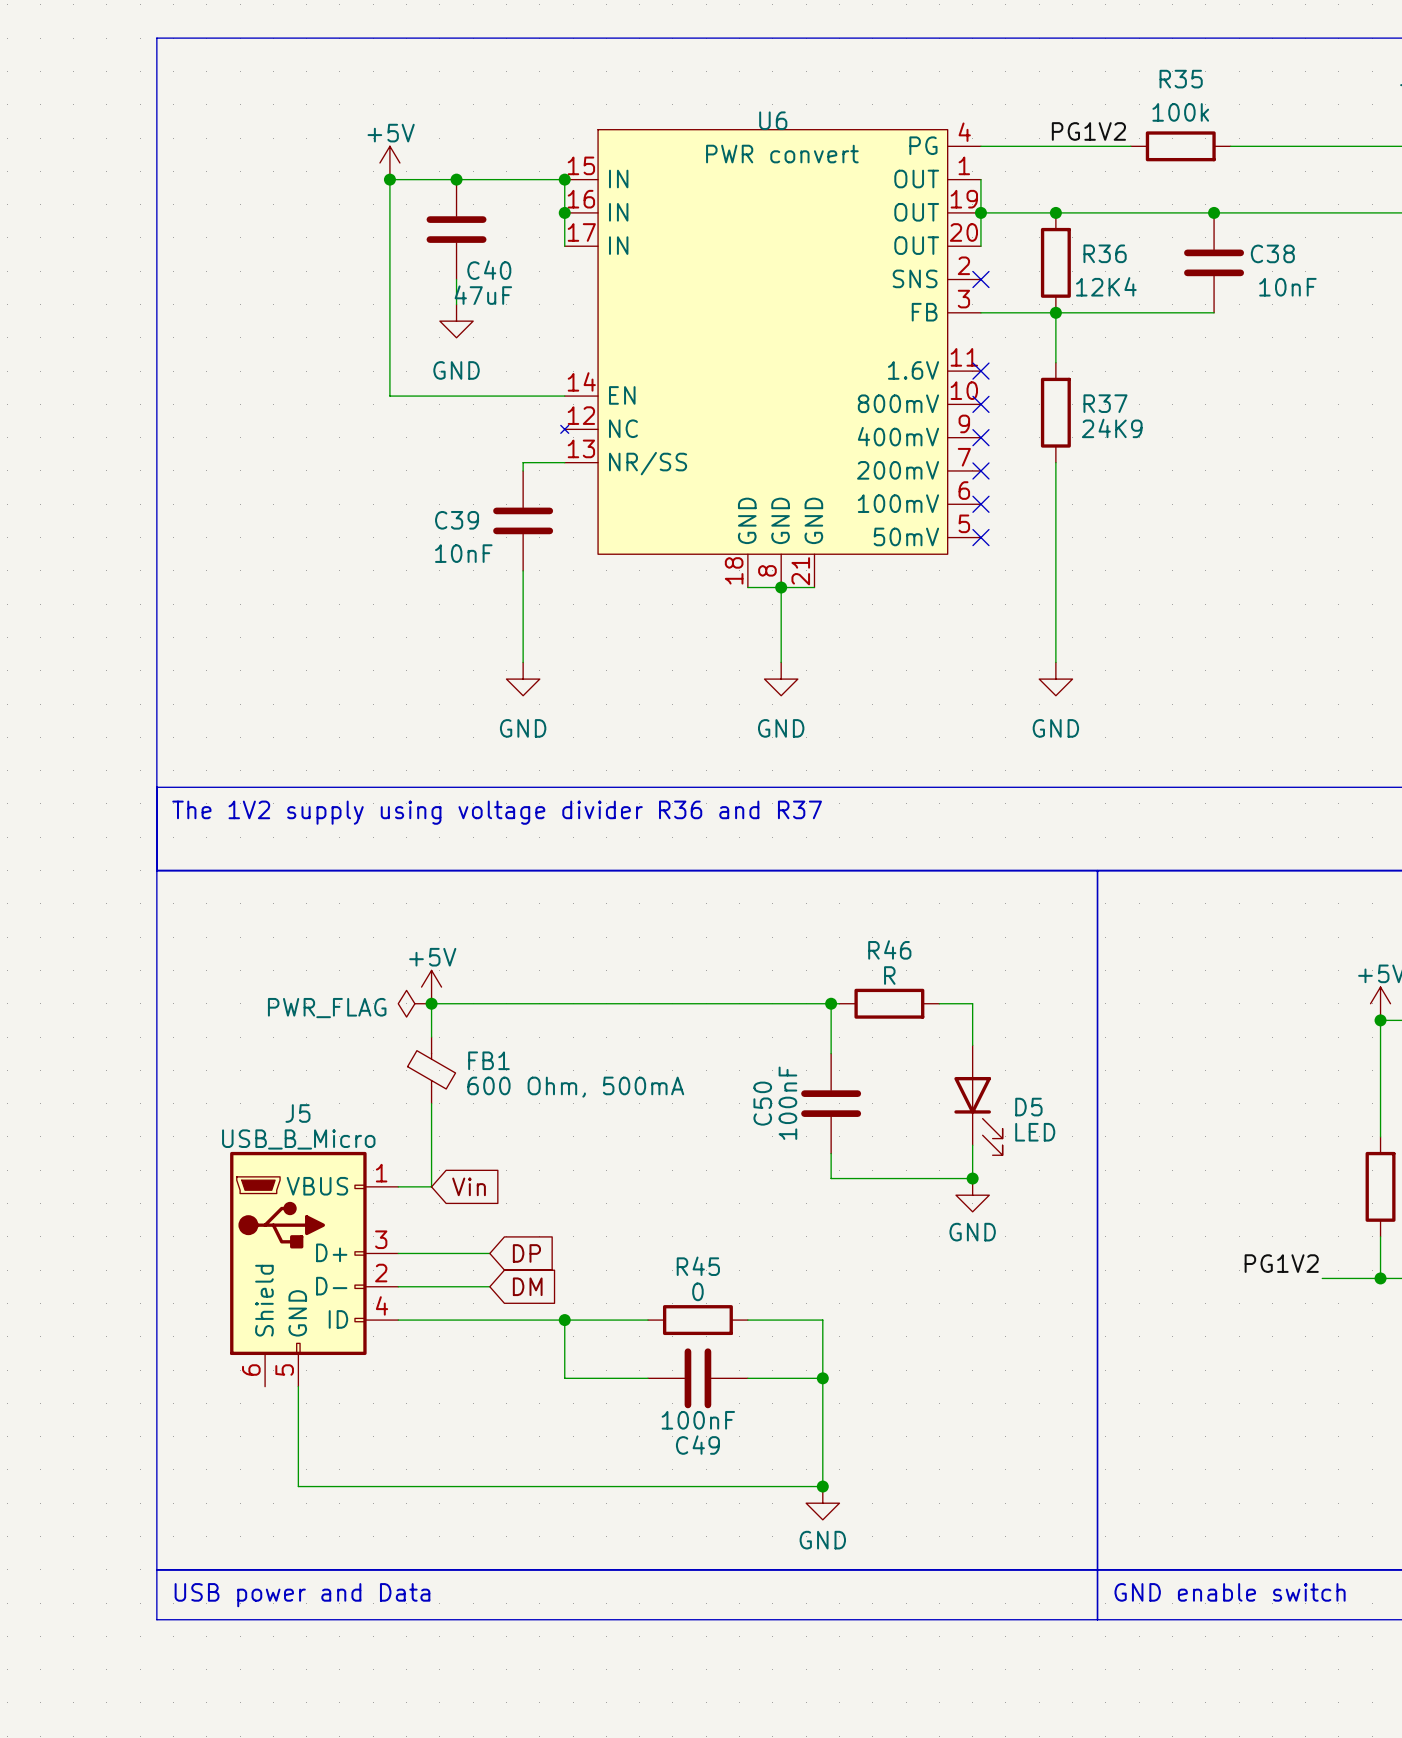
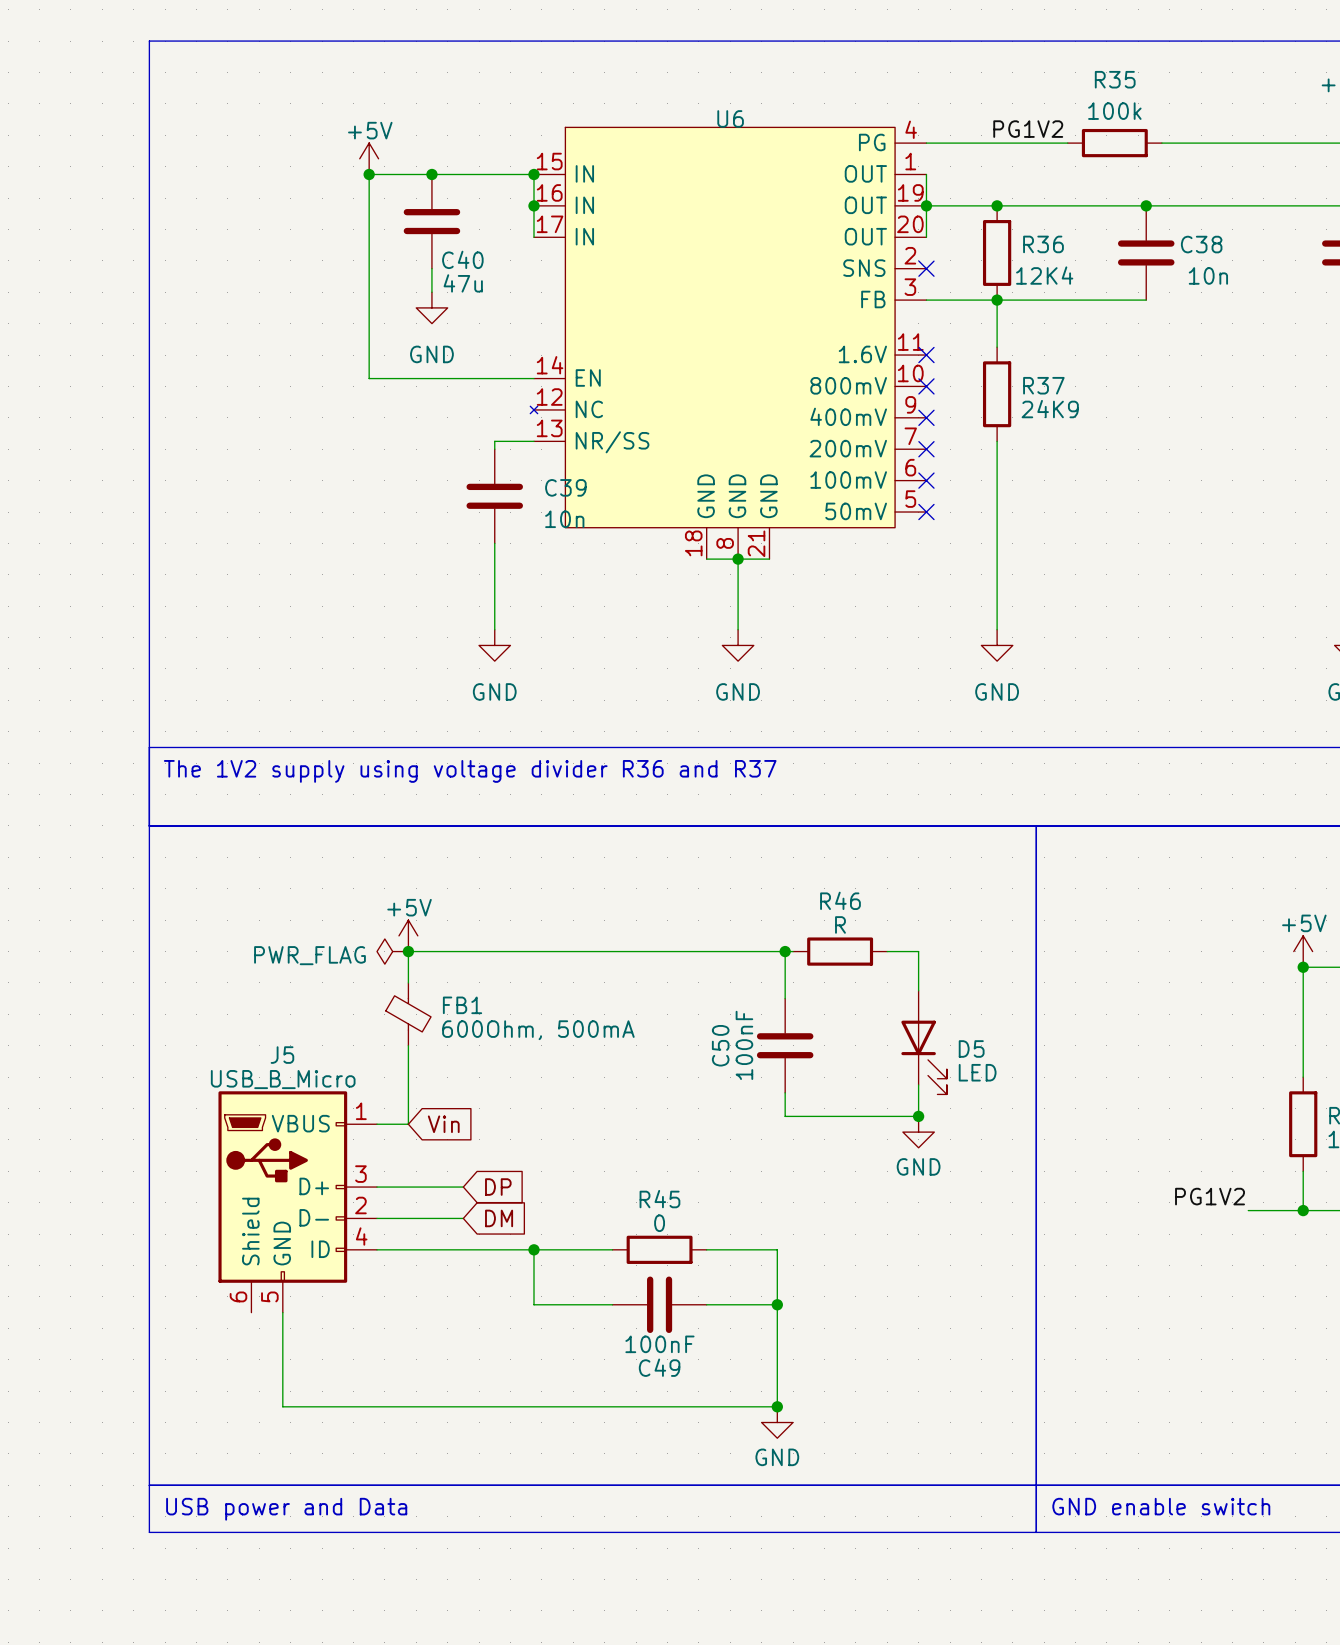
U6 value: PWR convert (782, 154) -> none
C38 value: 10nF (1287, 287) -> 10n (1208, 275)
C40 value: 47uF (483, 295) -> 47u (463, 283)
C39 name position: C39 (457, 520) -> C39 (565, 487)
C39 value: 10nF (463, 553) -> 10n (564, 519)
FB1 value: 600 Ohm, 500mA (575, 1087) -> 600Ohm, 500mA (538, 1030)

